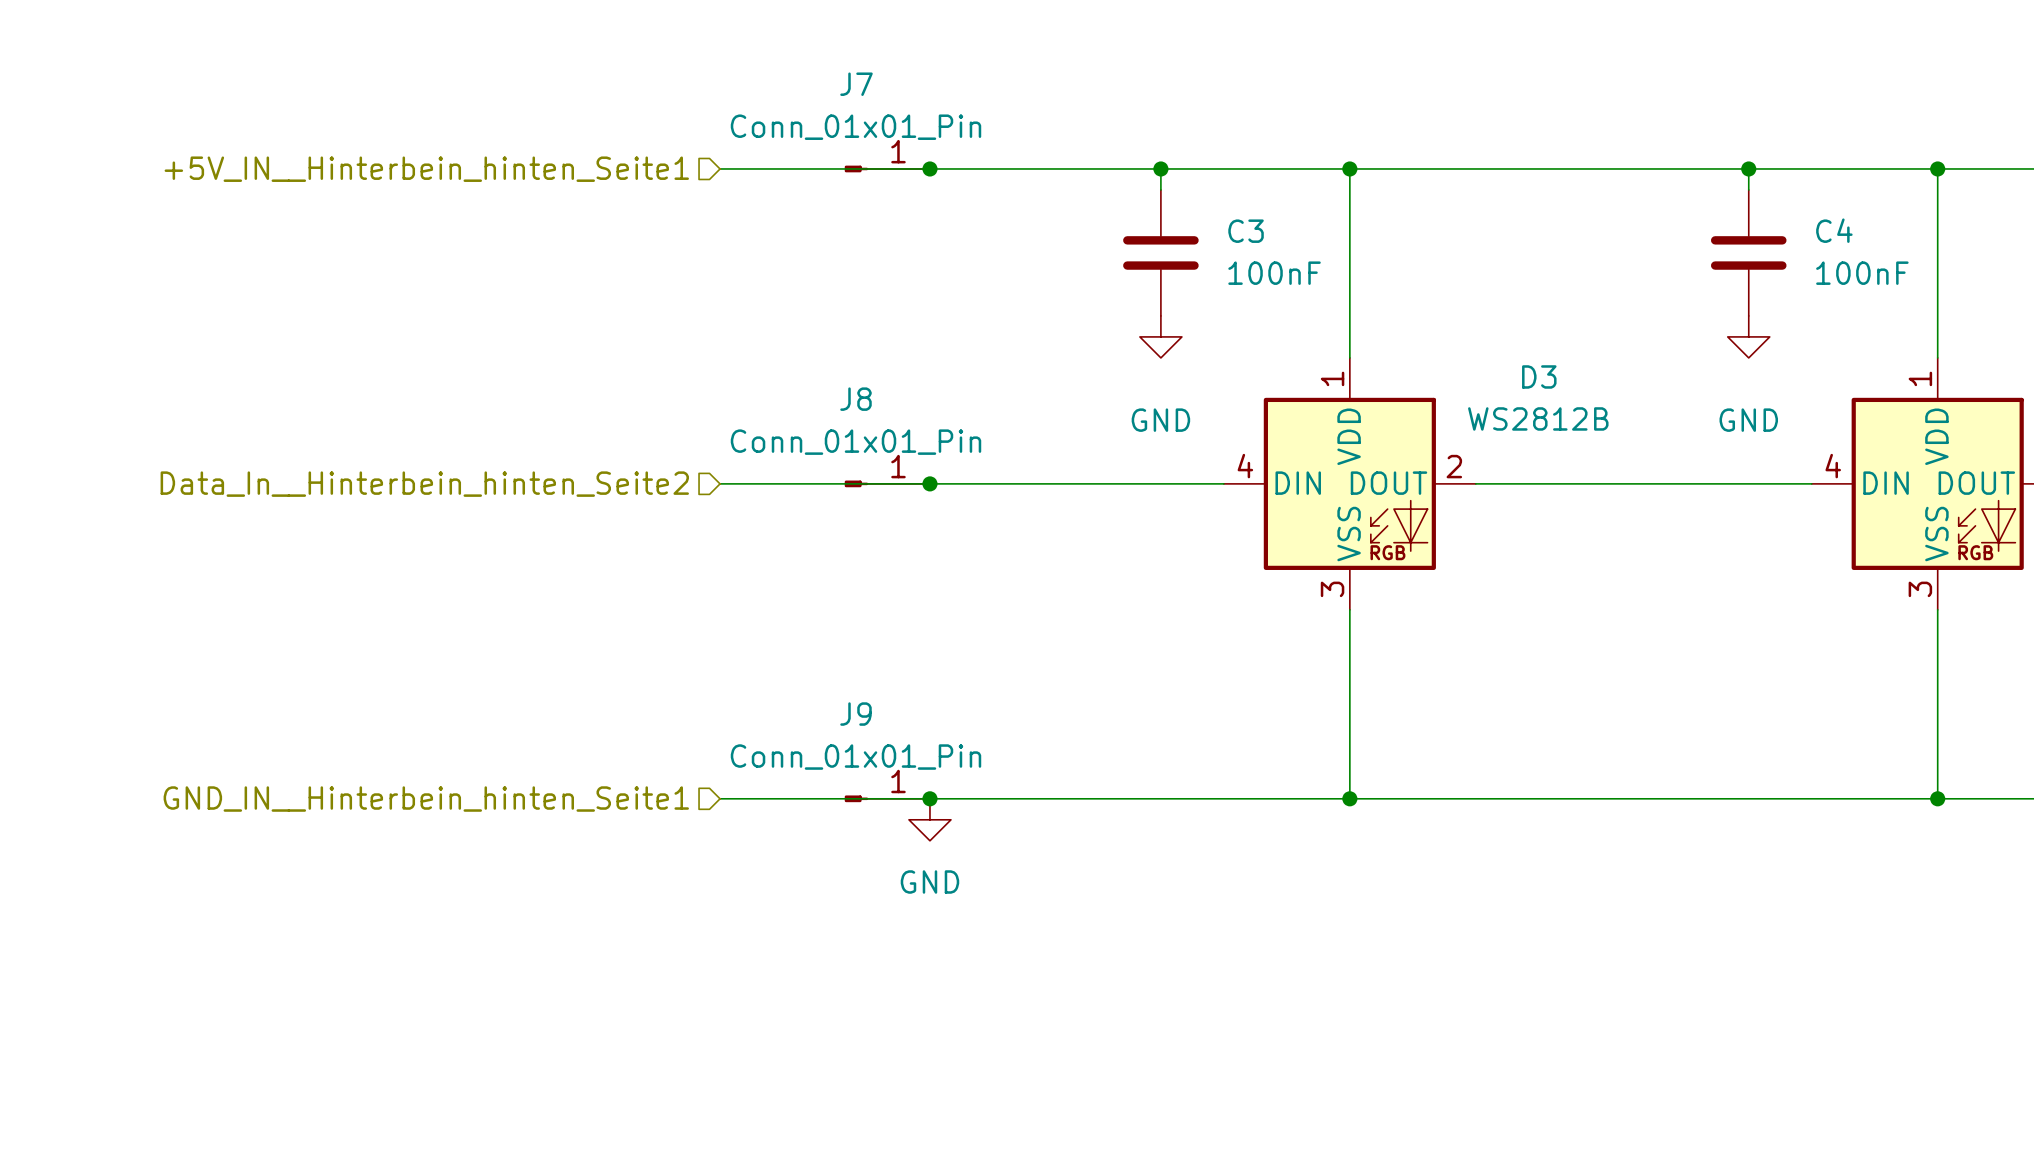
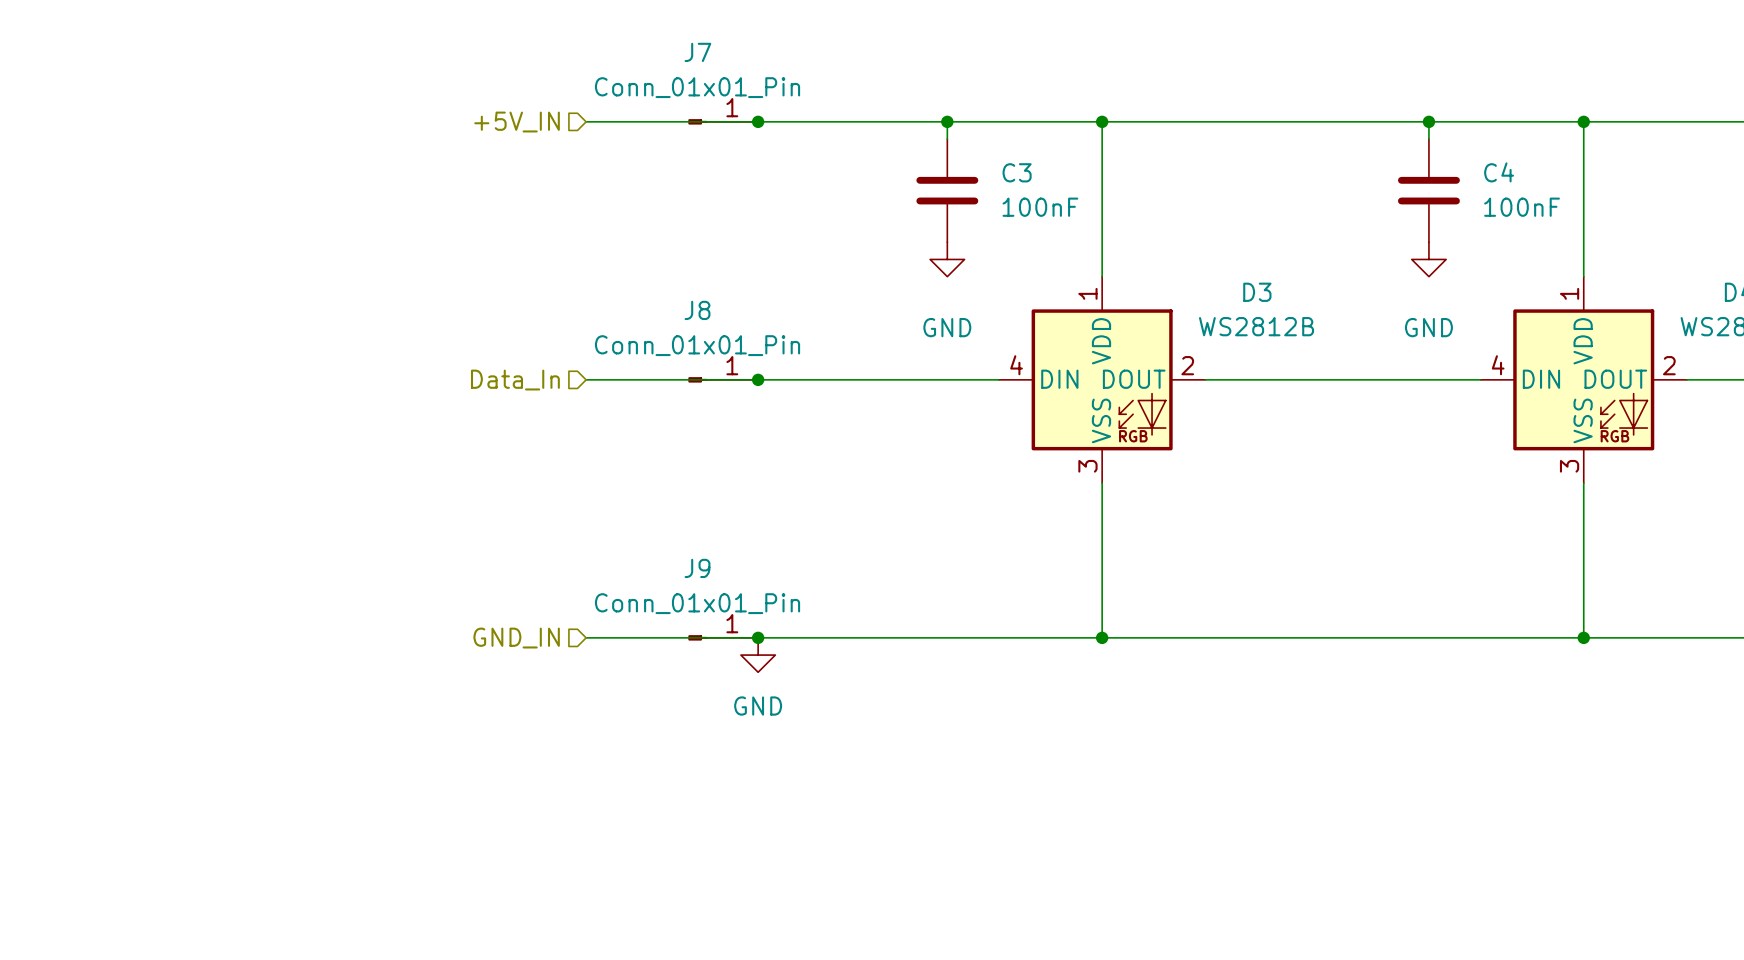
hierarchical label: +5V_IN__Hinterbein_hinten_Seite1 (426, 169) -> +5V_IN (517, 122)
hierarchical label: Data_In__Hinterbein_hinten_Seite2 (424, 484) -> Data_In (515, 380)
hierarchical label: GND_IN__Hinterbein_hinten_Seite1 (426, 799) -> GND_IN (516, 638)

